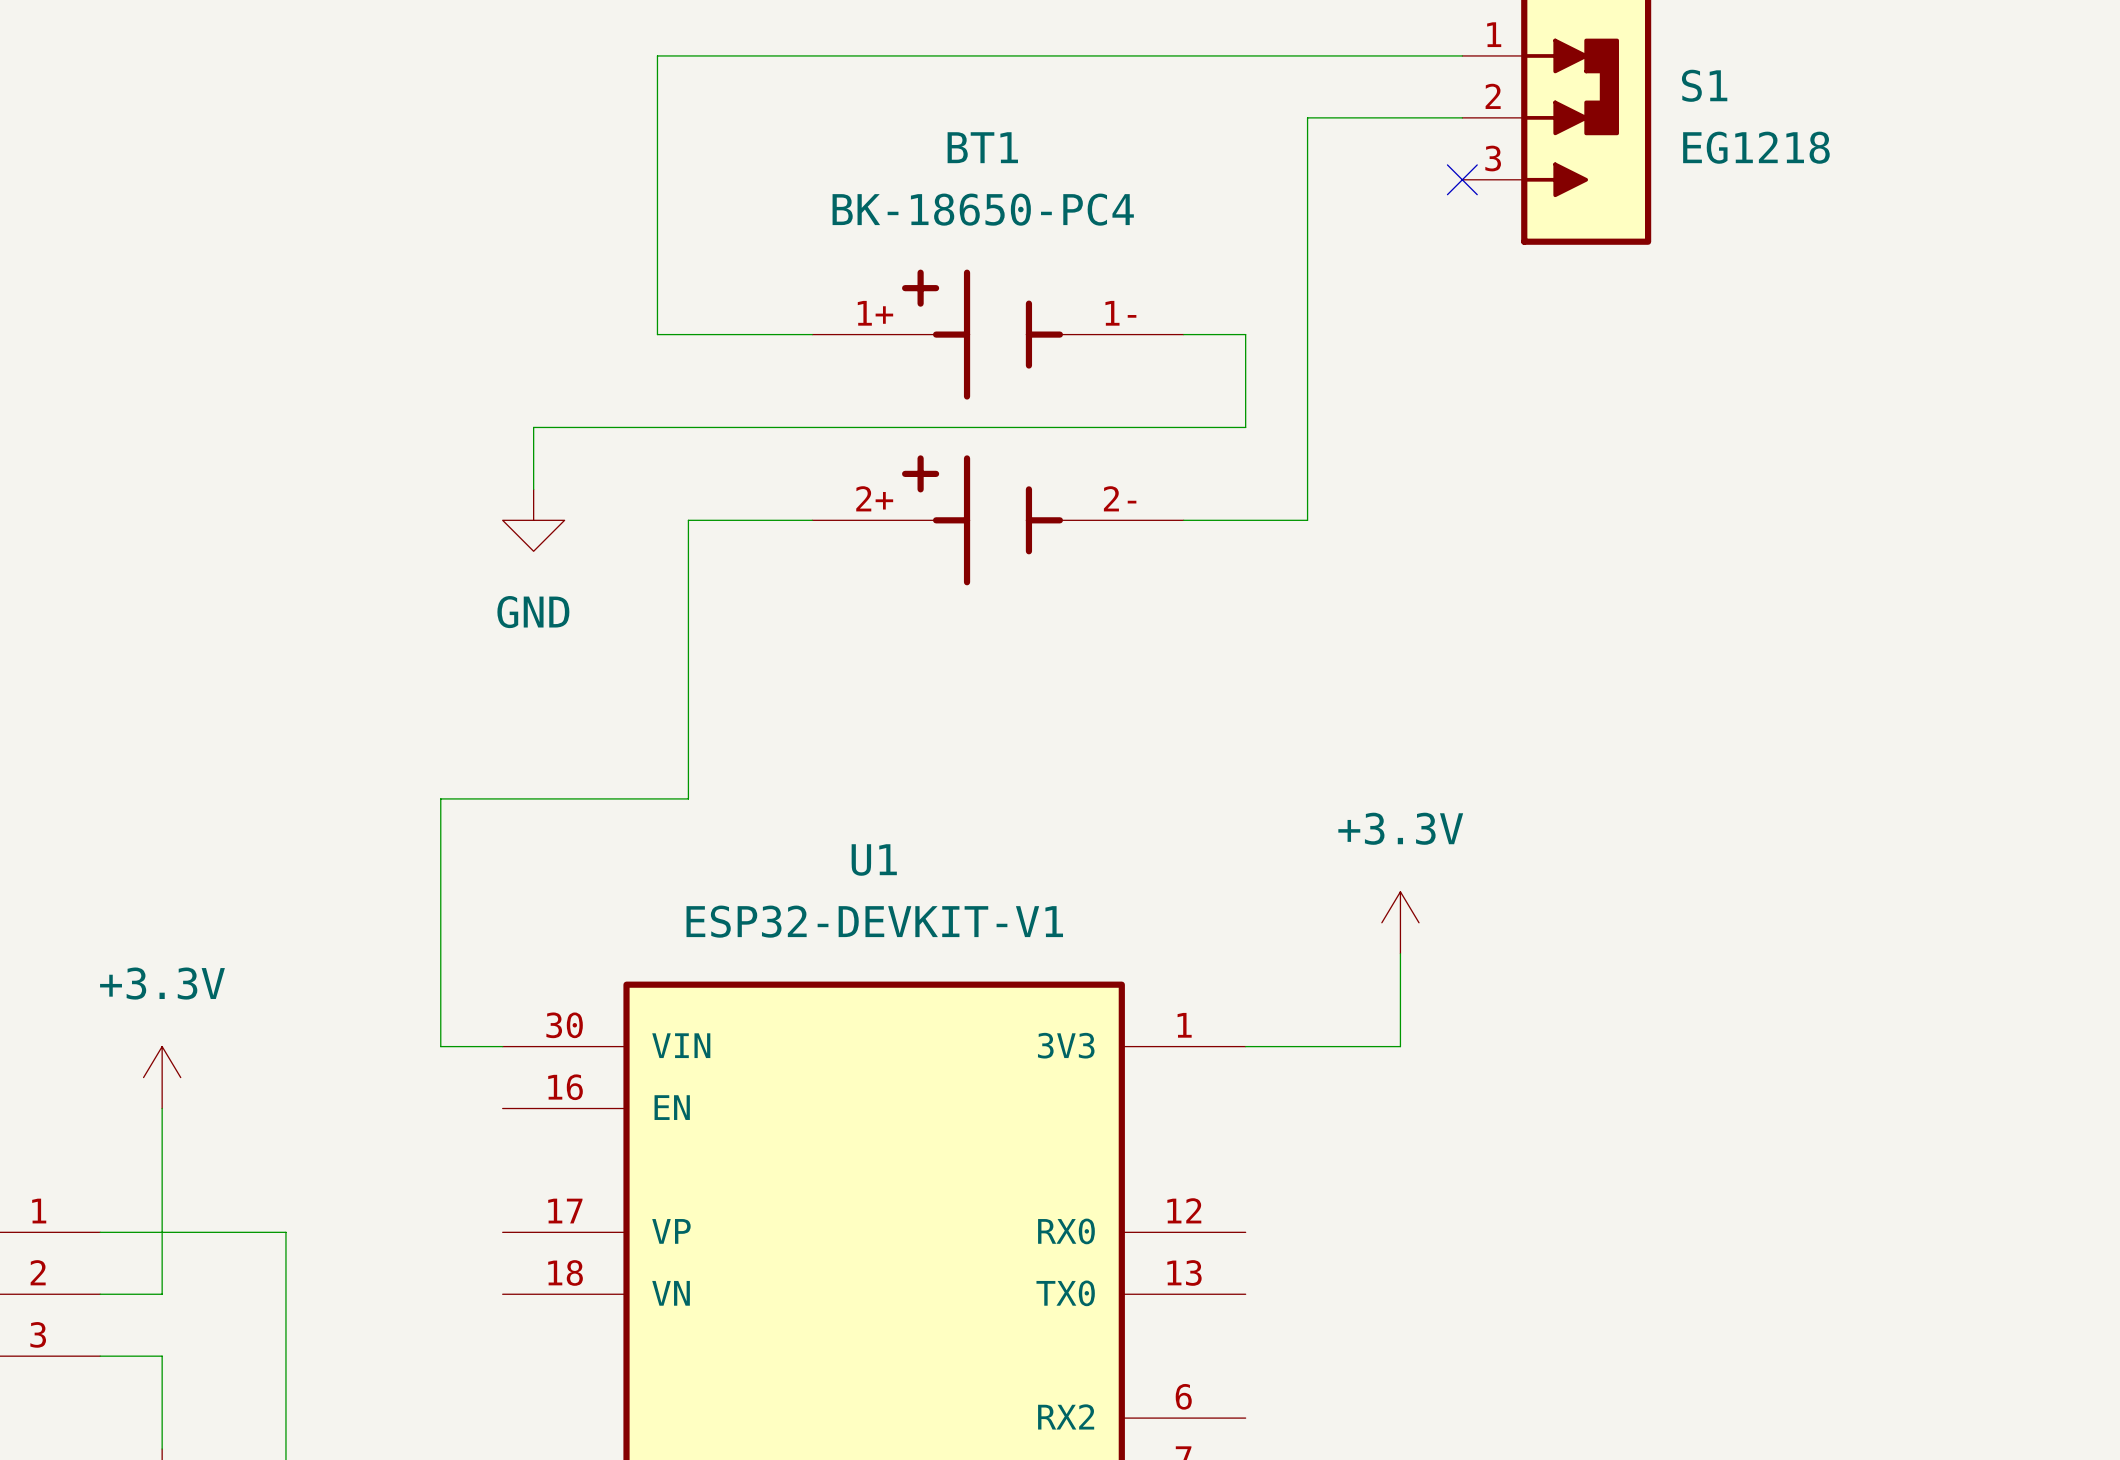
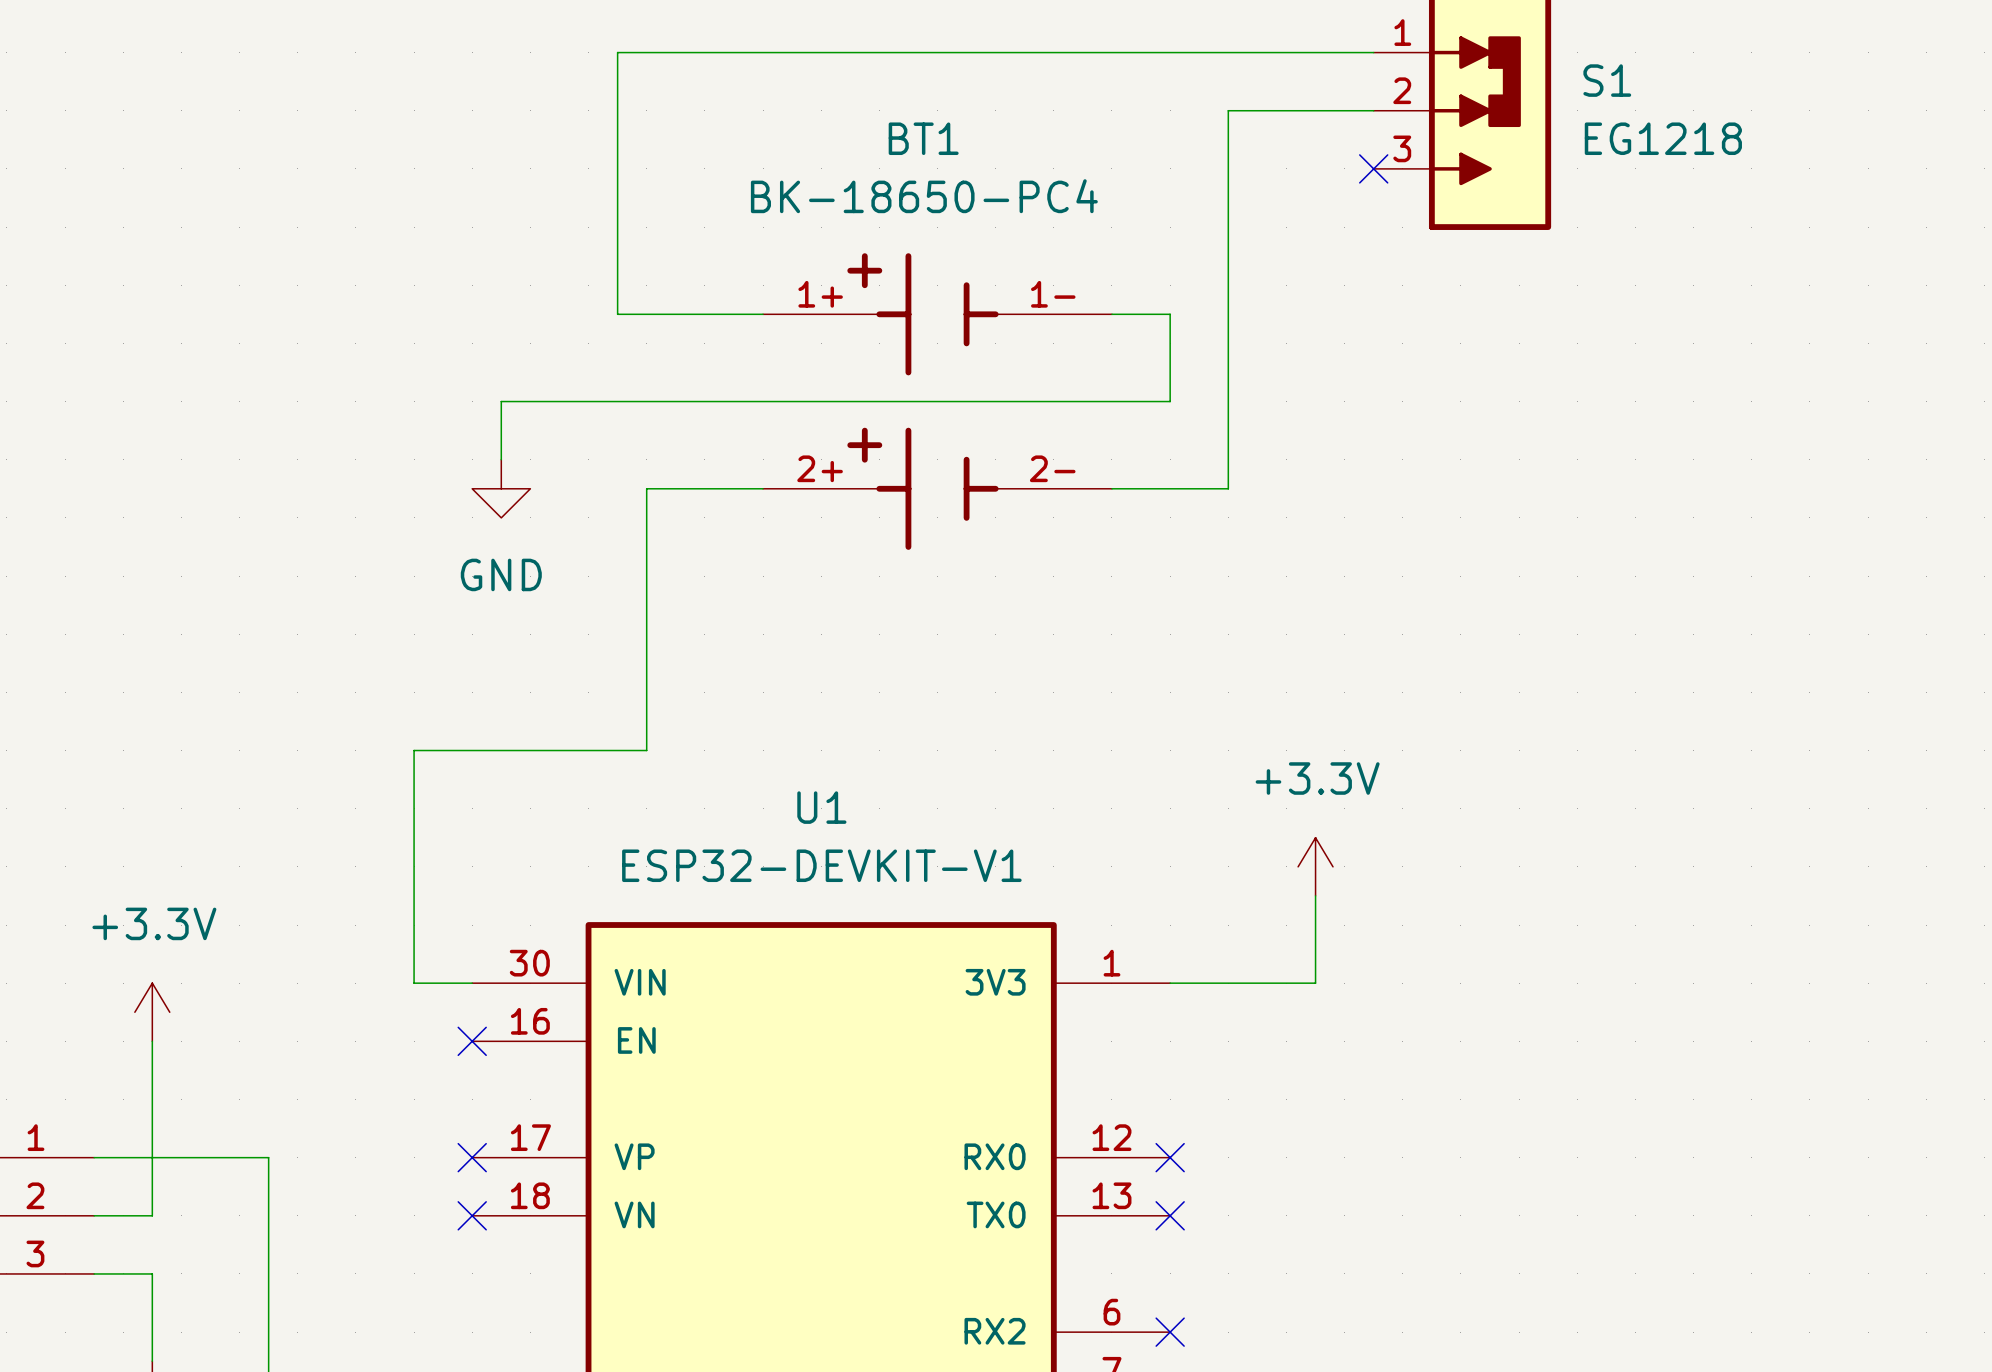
no-connect mark: none -> (472, 1041)
no-connect mark: none -> (472, 1157)
no-connect mark: none -> (1170, 1157)
no-connect mark: none -> (472, 1215)
no-connect mark: none -> (1170, 1215)
no-connect mark: none -> (1170, 1332)

